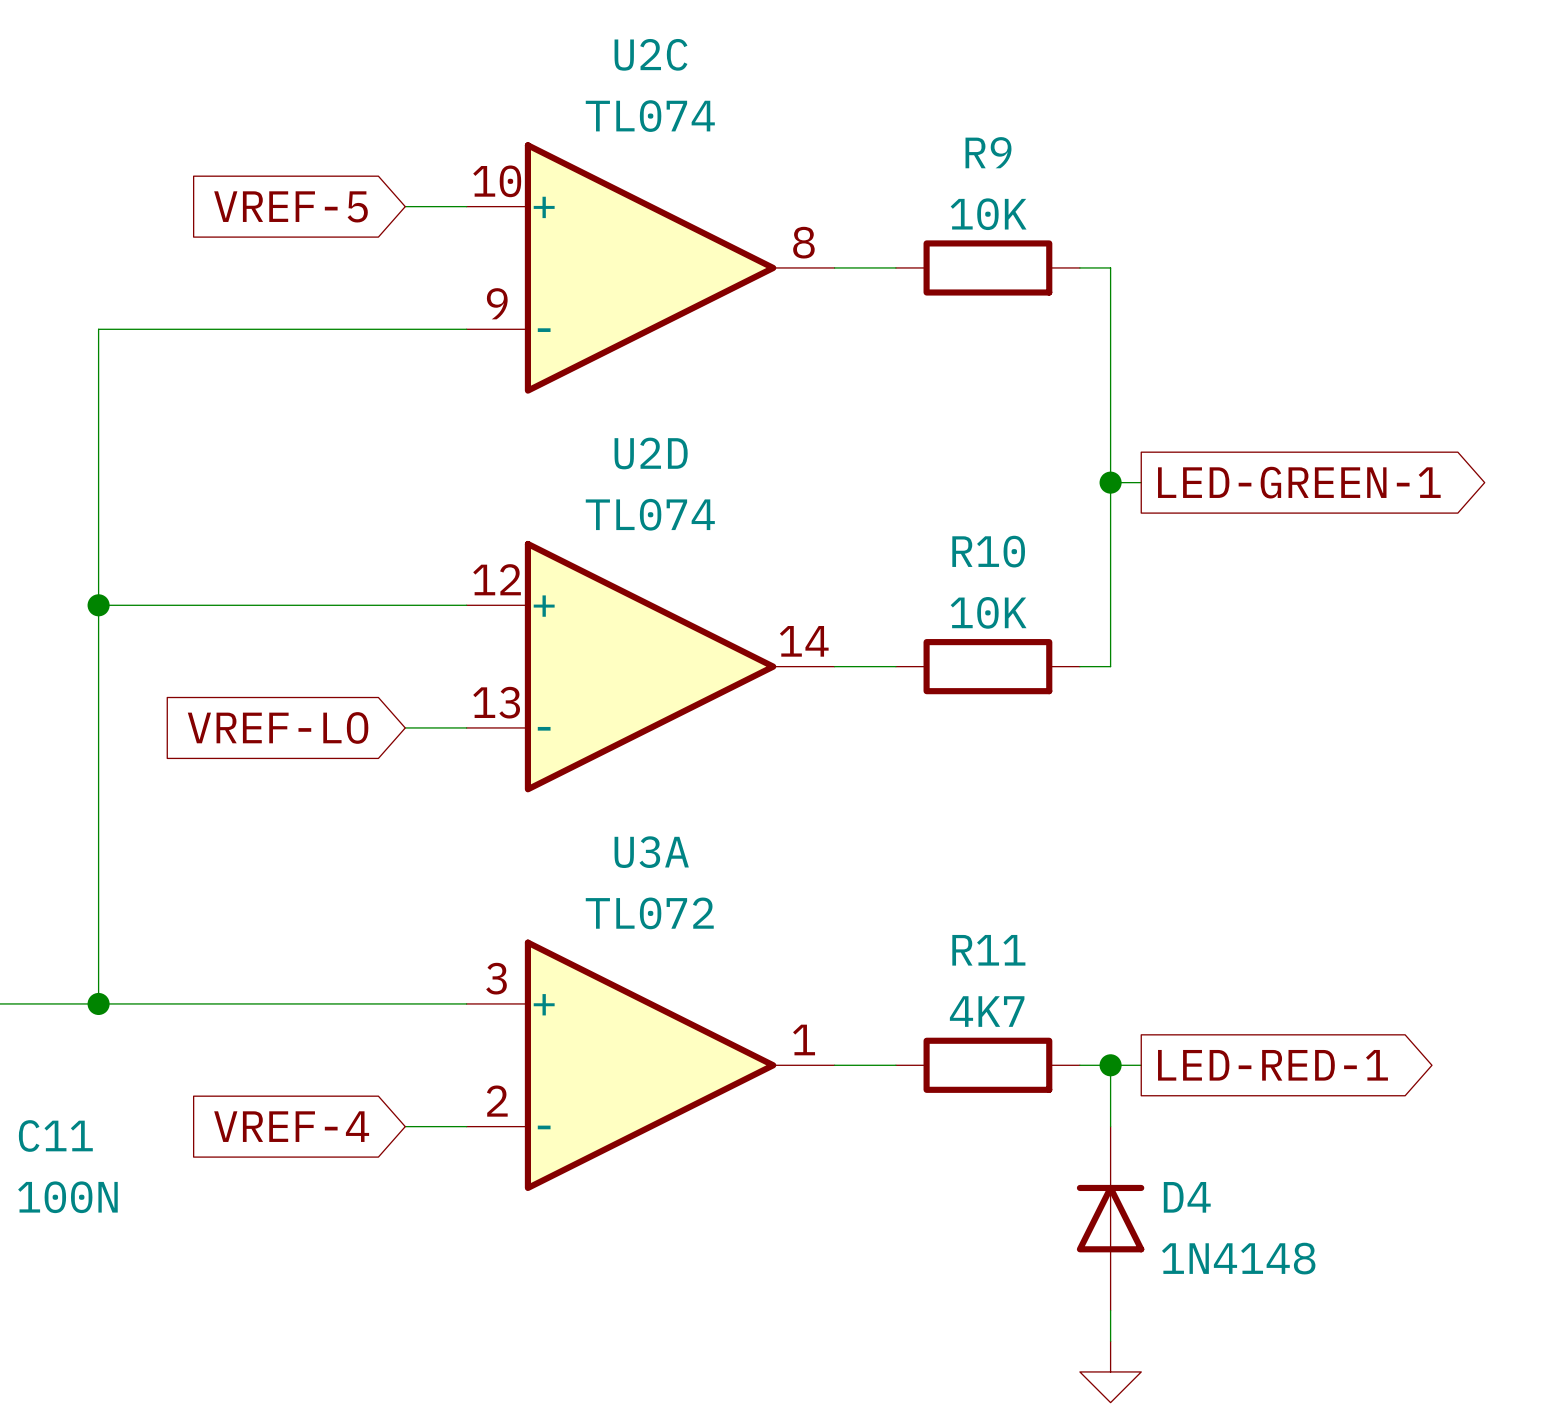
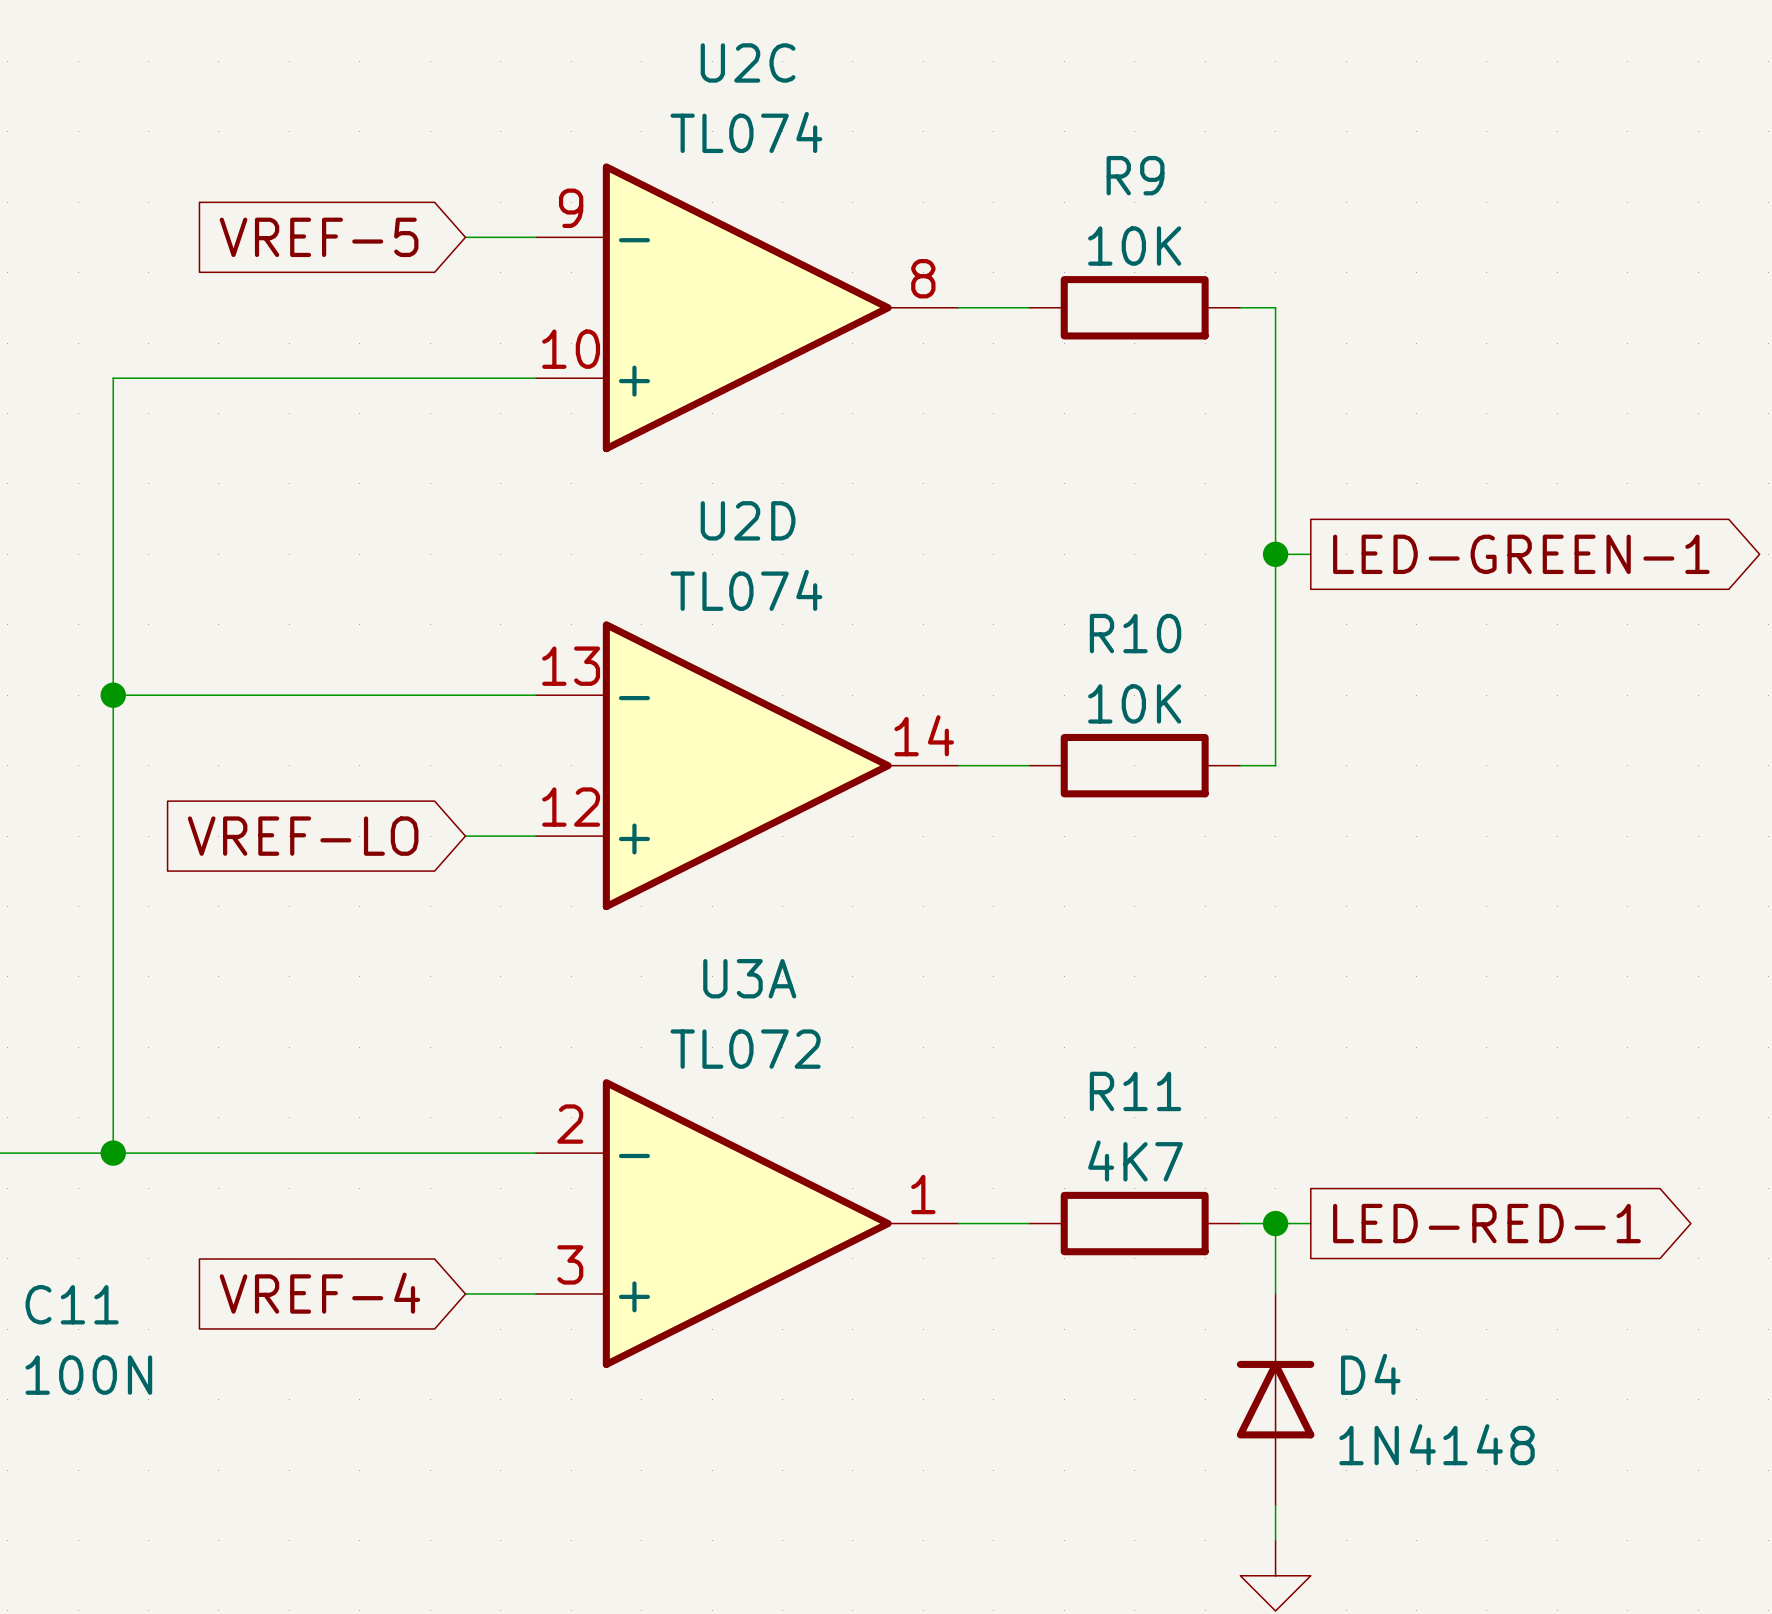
U2C flip: as is (650, 267) -> up-down (747, 307)
U2D flip: as is (650, 666) -> up-down (747, 765)
U3A flip: as is (650, 1065) -> up-down (747, 1223)

